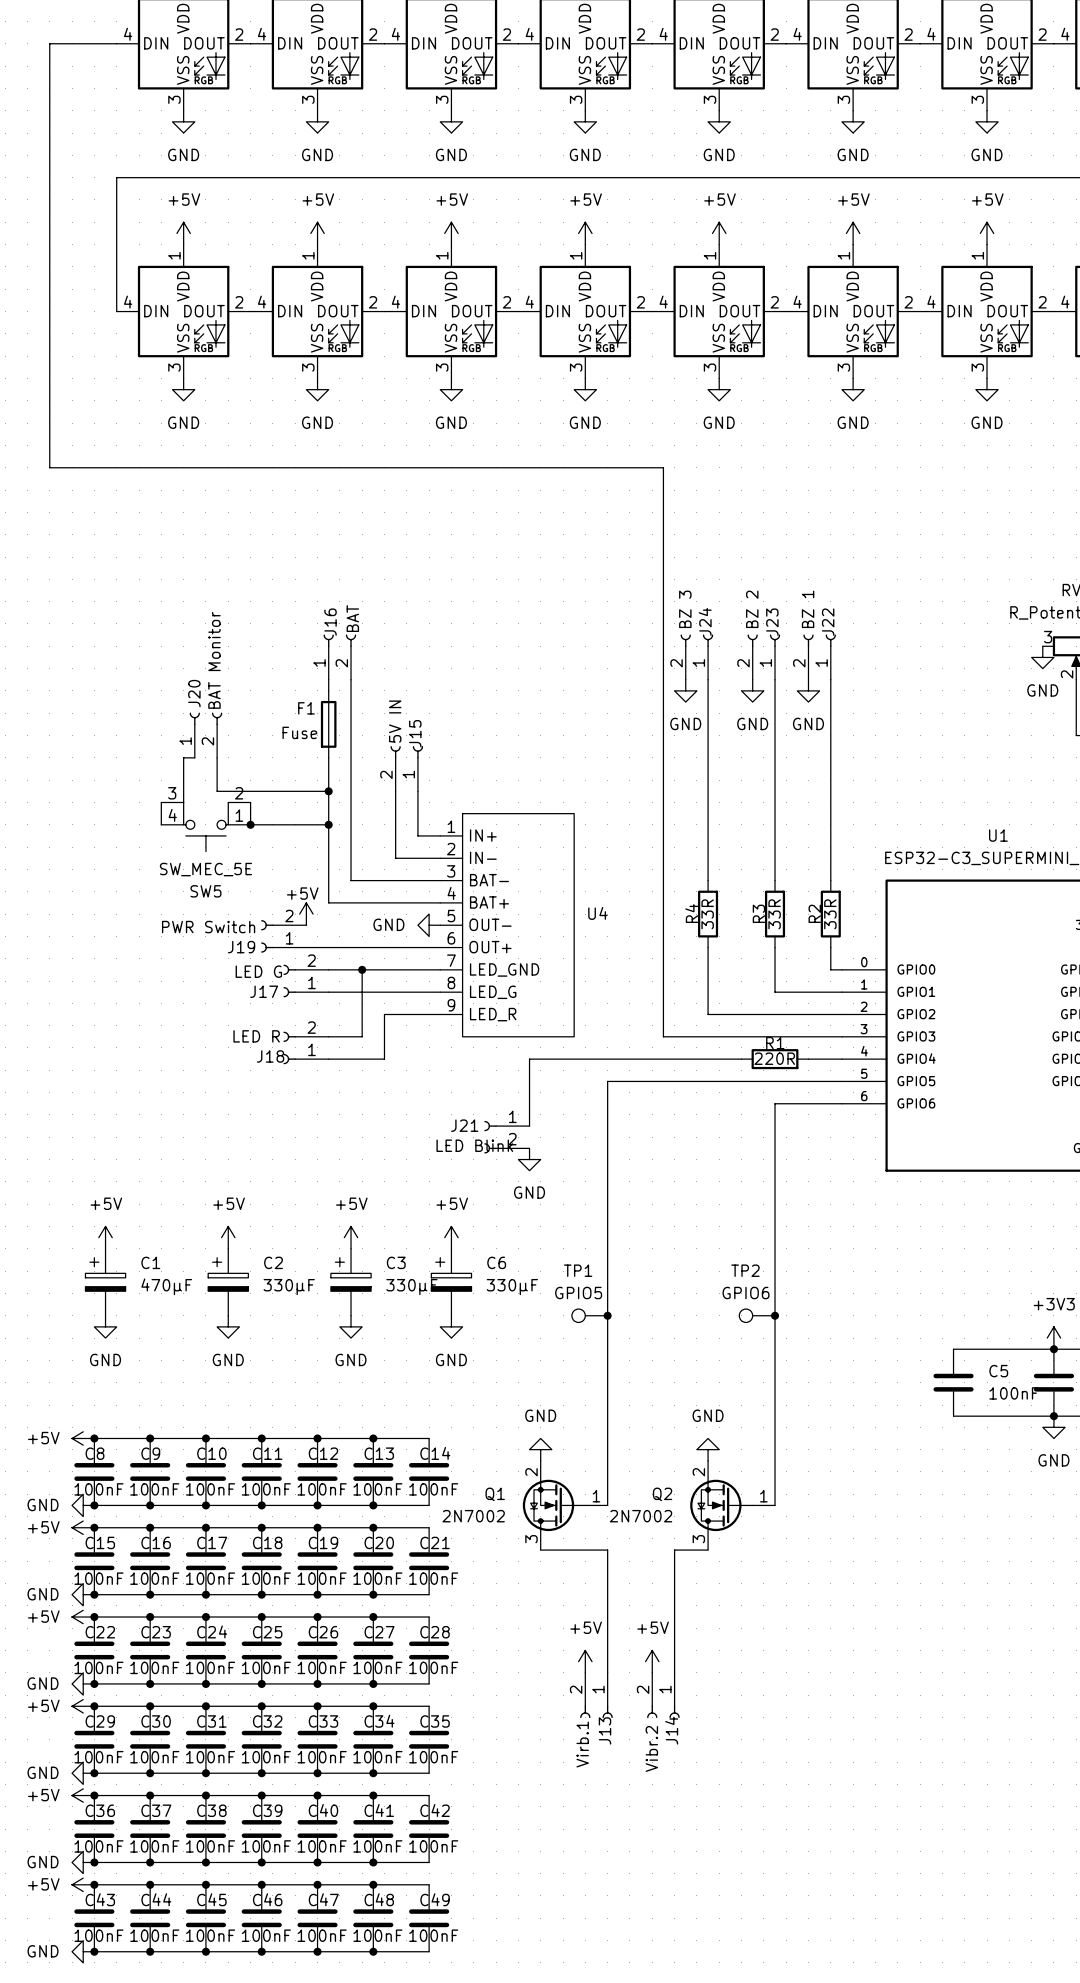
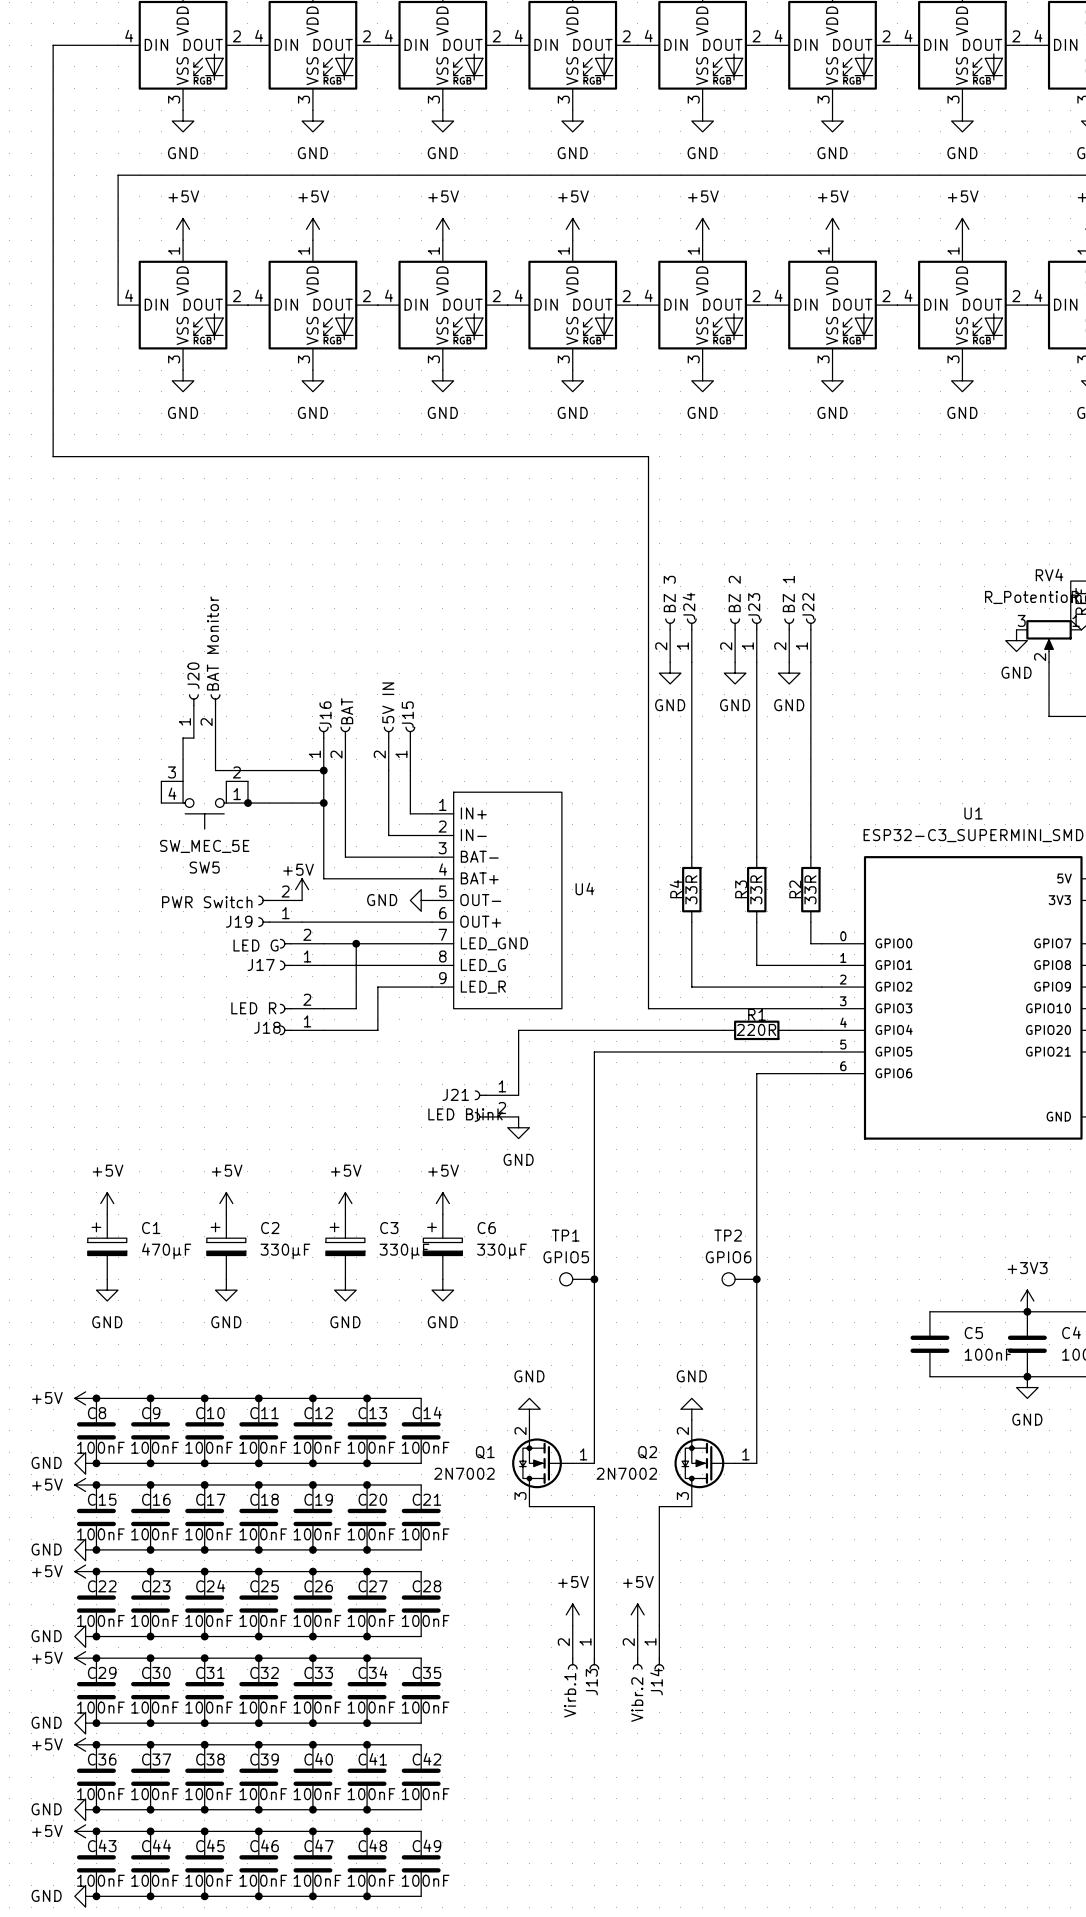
J16 position: (339, 657) -> (334, 748)
wire: (328, 679) (328, 690) -> none
wire: (351, 679) (351, 791) -> none
F1: Fuse (328, 724) -> none

